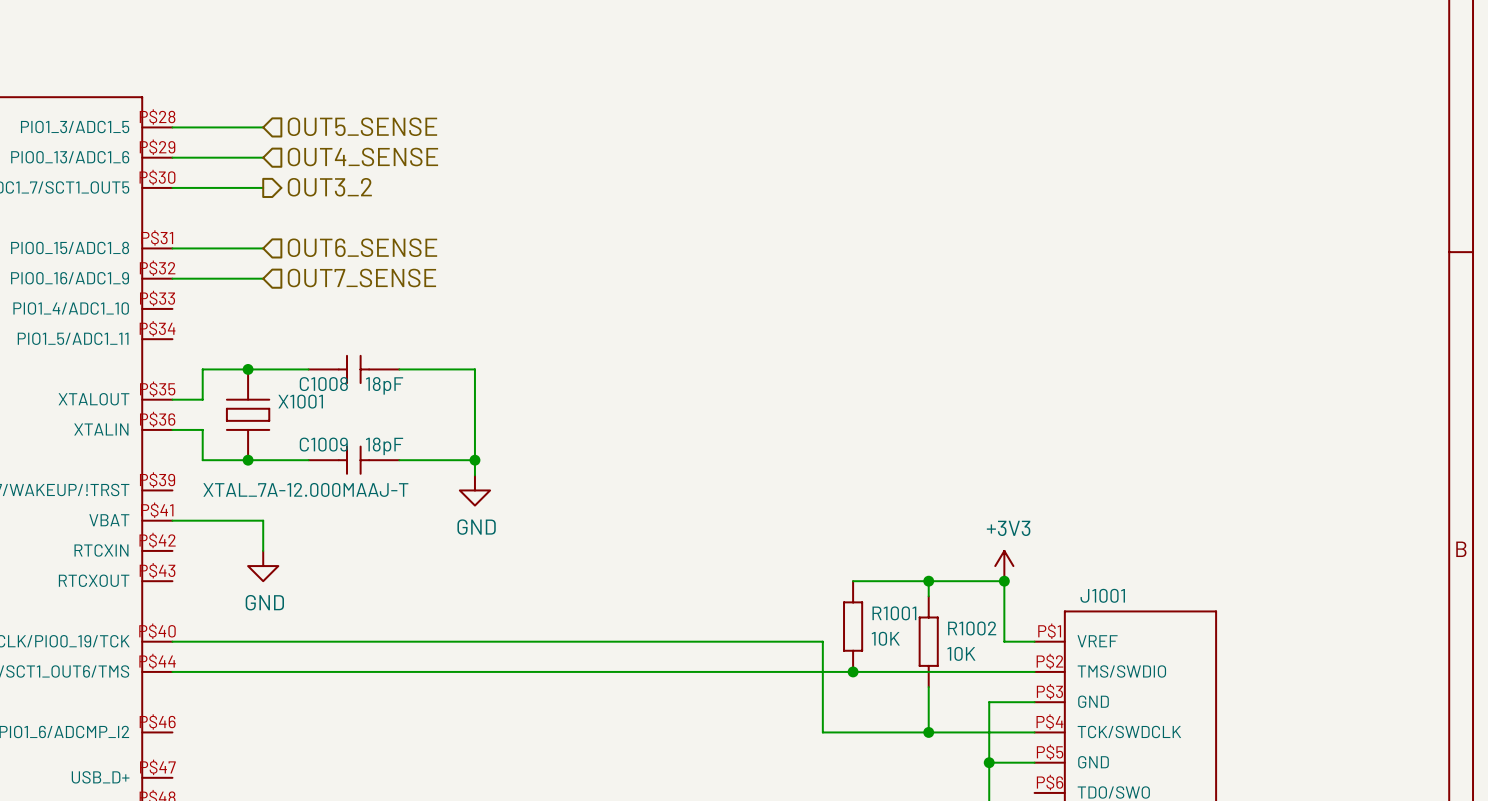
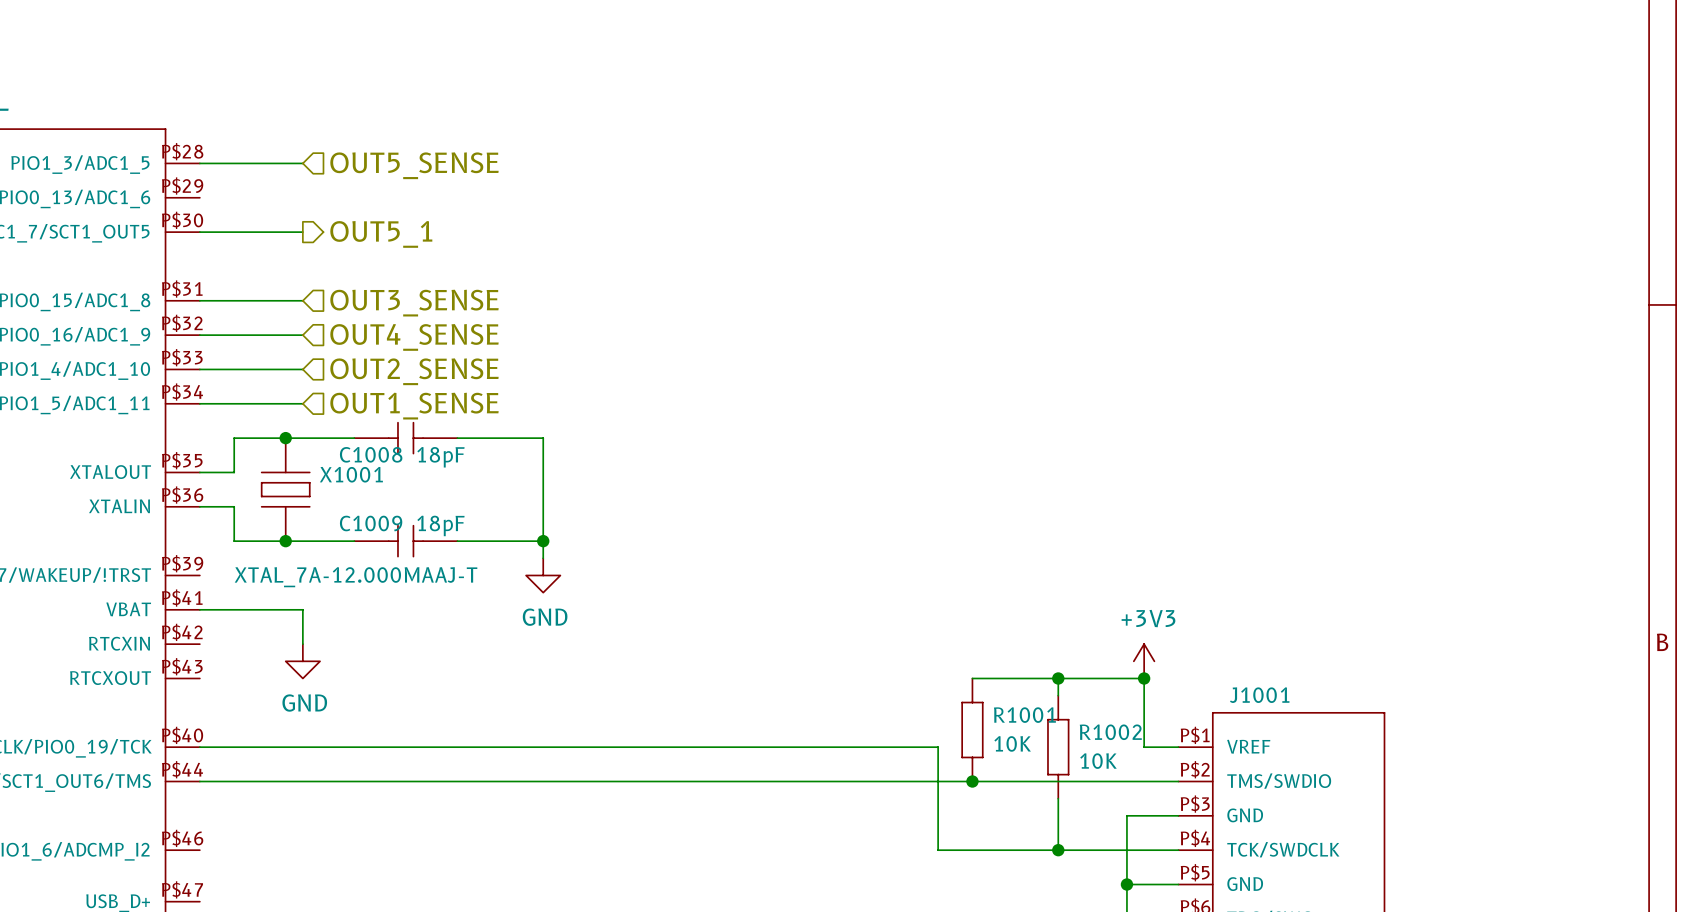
wire: (172, 157) (263, 157) -> (199, 369) (302, 369)
hierarchical label: OUT4_SENSE (362, 157) -> none
hierarchical label: OUT3_2 (329, 187) -> OUT5_1 (381, 234)
hierarchical label: OUT6_SENSE (362, 247) -> OUT3_SENSE (414, 303)
hierarchical label: OUT7_SENSE (361, 278) -> OUT4_SENSE (414, 337)
hierarchical label: none -> OUT2_SENSE (414, 371)
hierarchical label: none -> OUT1_SENSE (414, 406)
wire: none -> (199, 403) (302, 403)

